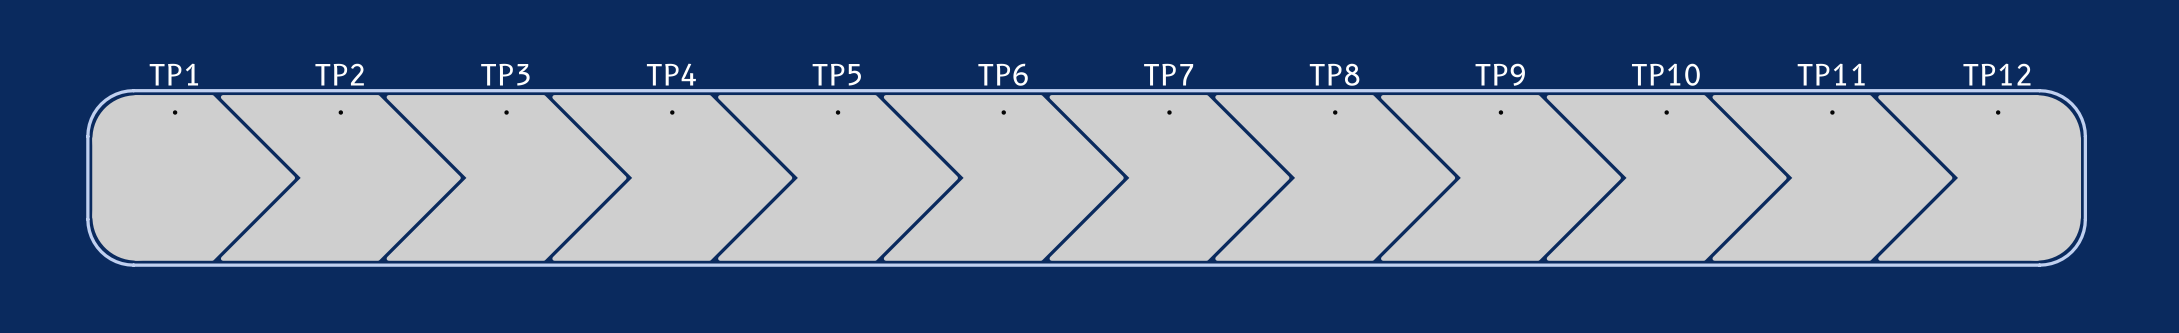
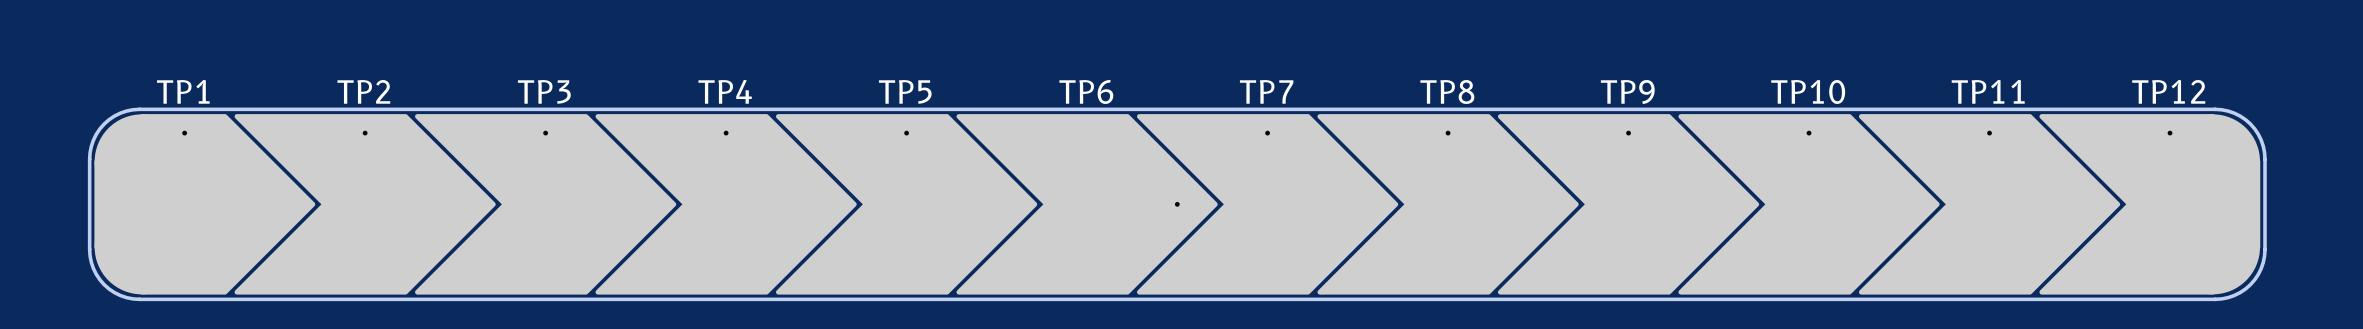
TP6 footprint: [883, 95, 1124, 261] -> [956, 114, 1218, 295]

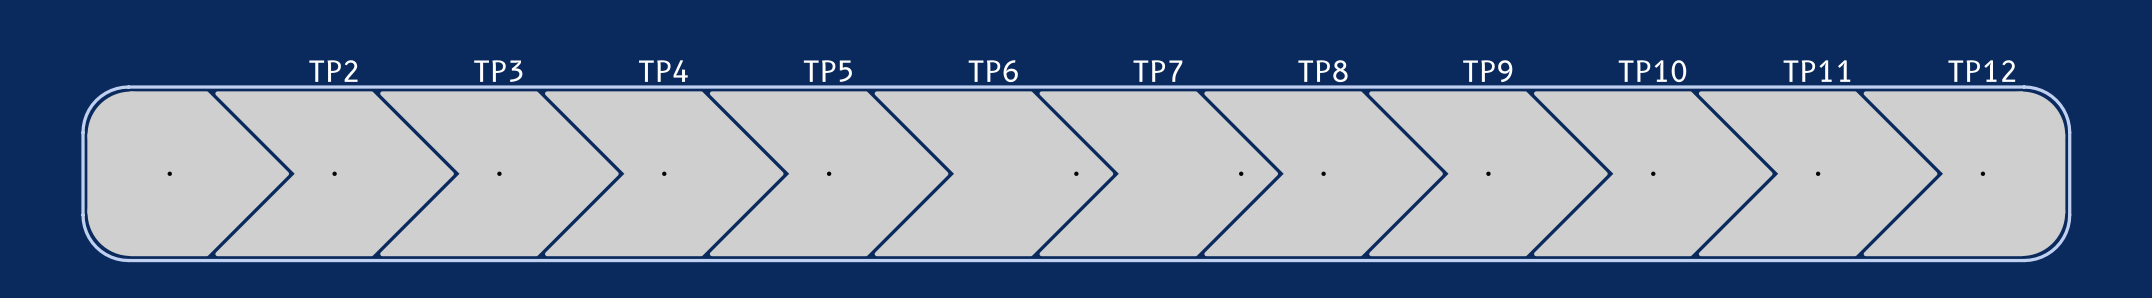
TP2 footprint: [234, 114, 496, 295] -> [215, 91, 454, 257]
TP3 footprint: [415, 114, 677, 295] -> [380, 91, 619, 257]
TP4 footprint: [595, 114, 857, 295] -> [544, 91, 784, 257]
TP5 footprint: [775, 114, 1038, 295] -> [709, 91, 949, 257]
TP7 footprint: [1136, 114, 1399, 295] -> [1039, 91, 1279, 257]
TP8 footprint: [1317, 114, 1579, 295] -> [1204, 91, 1443, 257]
TP9 footprint: [1497, 114, 1760, 295] -> [1369, 91, 1608, 257]
TP10 footprint: [1678, 114, 1940, 295] -> [1533, 91, 1773, 257]
TP11 footprint: [1858, 114, 2121, 295] -> [1698, 91, 1938, 257]
TP12 footprint: [2039, 114, 2261, 295] -> [1863, 91, 2066, 257]
TP1: (204, 204) -> none
part: none -> (188, 173)

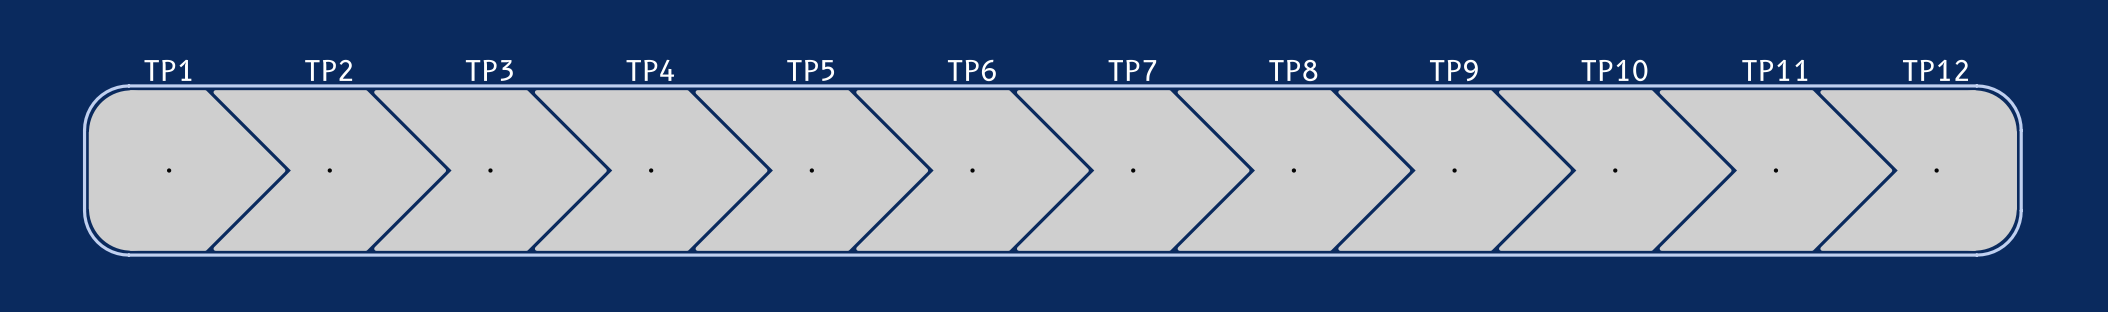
TP1 name: none -> TP1 (167, 70)
TP6 footprint: [874, 91, 1114, 257] -> [856, 90, 1089, 251]
TP7 footprint: [1039, 91, 1279, 257] -> [1016, 90, 1250, 251]

